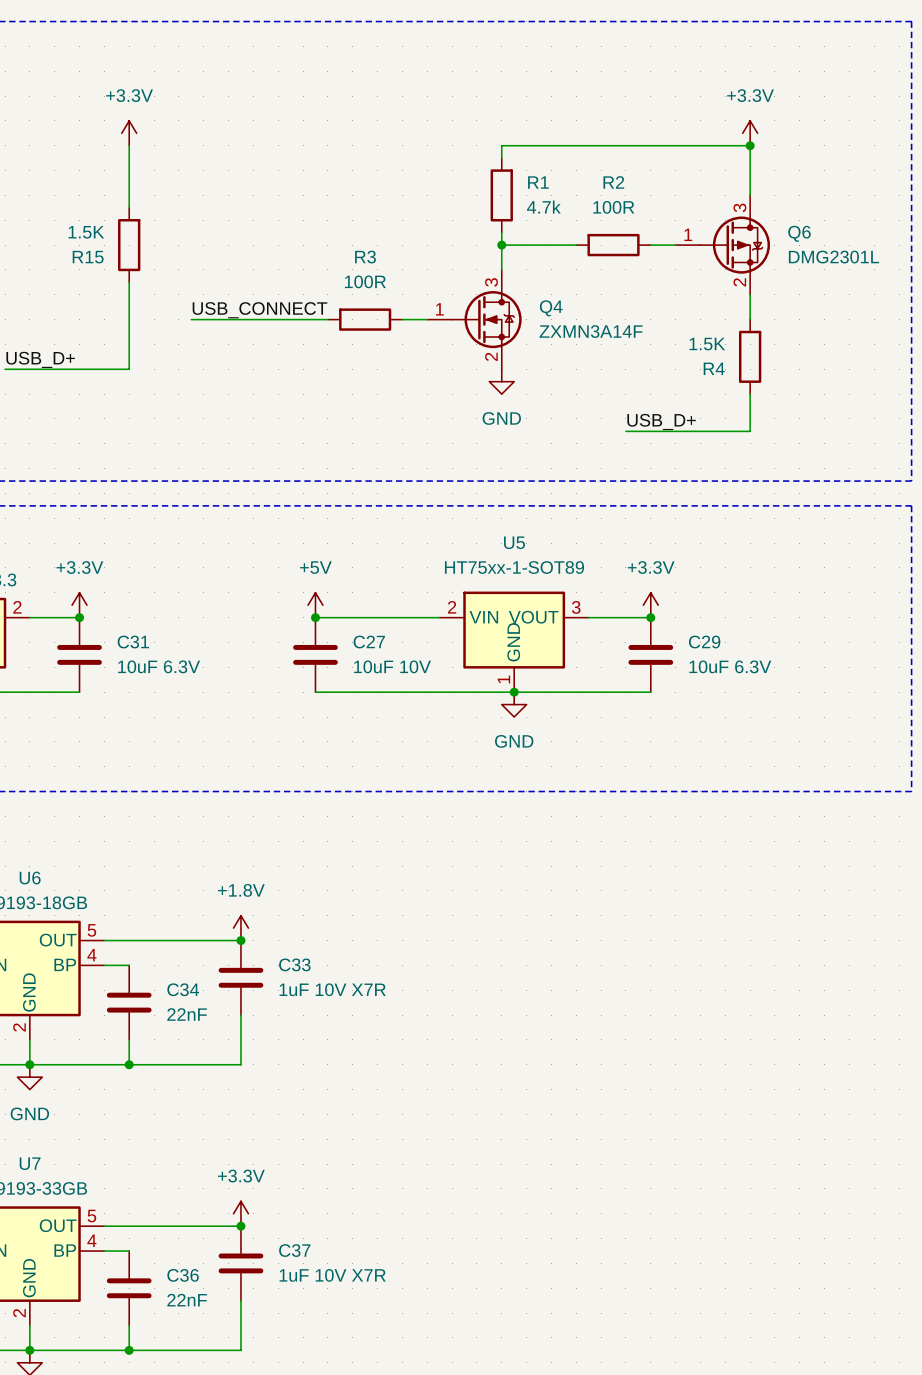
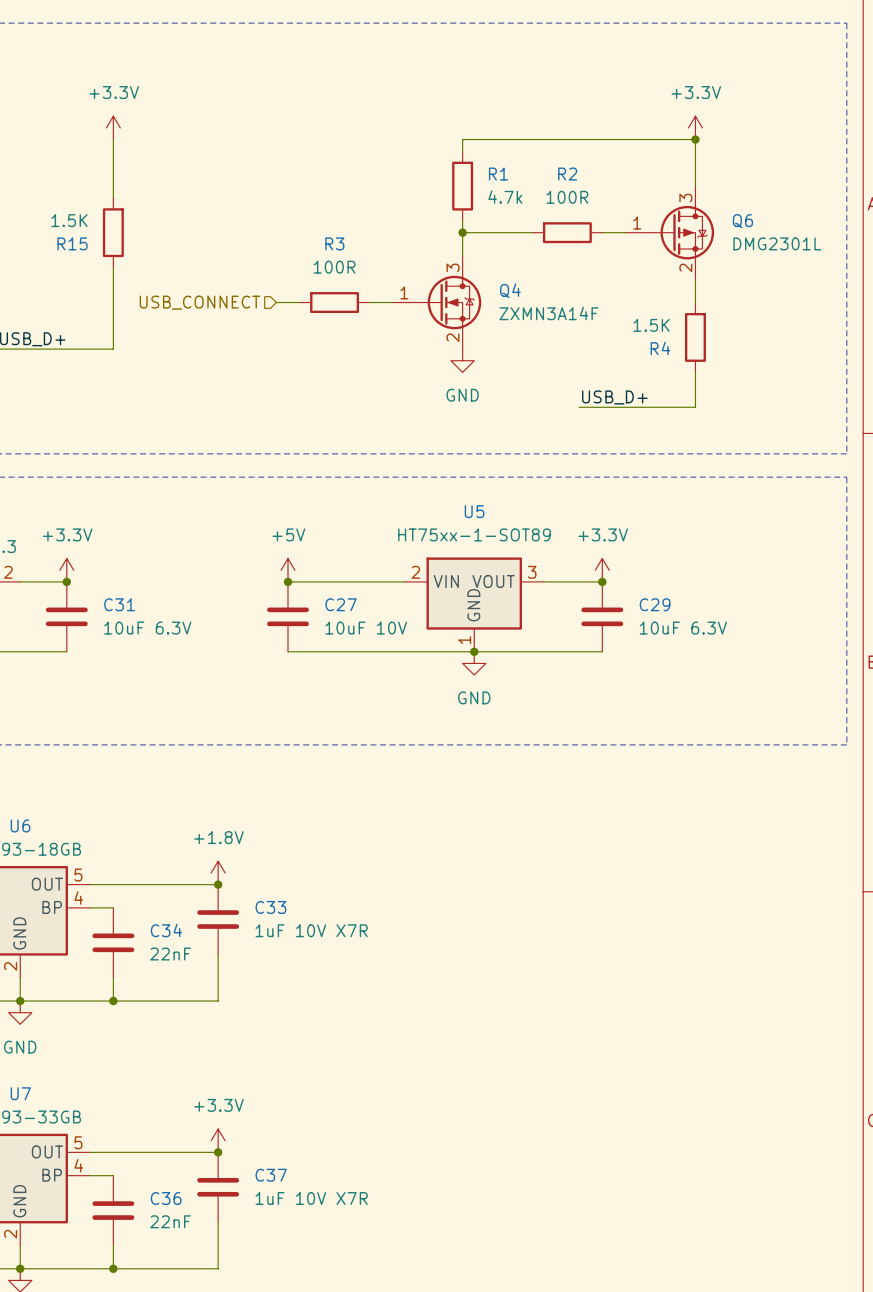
label: USB_CONNECT (259, 310) -> none
wire: (191, 319) (303, 319) -> none
hierarchical label: none -> USB_CONNECT (199, 302)

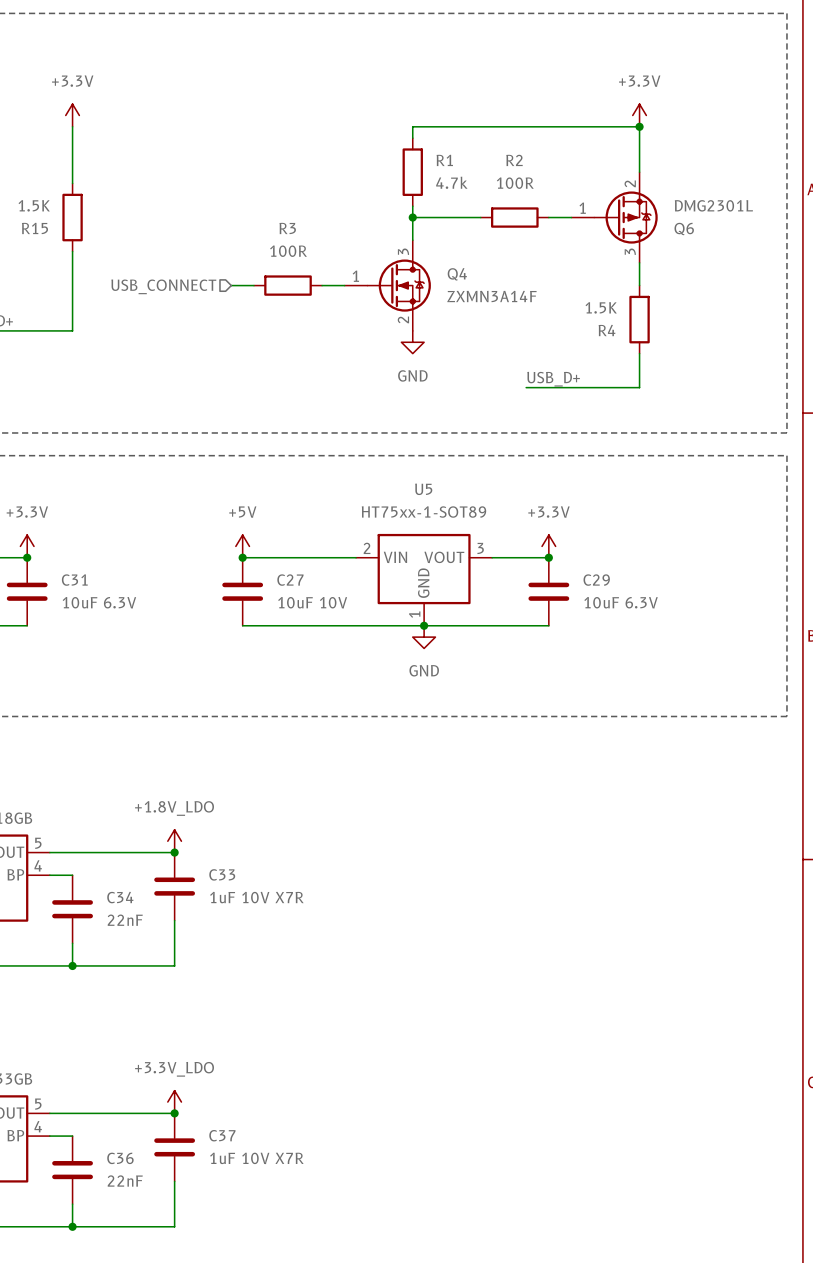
Q6 flip: as is (681, 232) -> up-down (625, 217)
power symbol: +1.8V (218, 872) -> +1.8V_LDO (174, 841)
power symbol: +3.3V (218, 1140) -> +3.3V_LDO (174, 1102)

